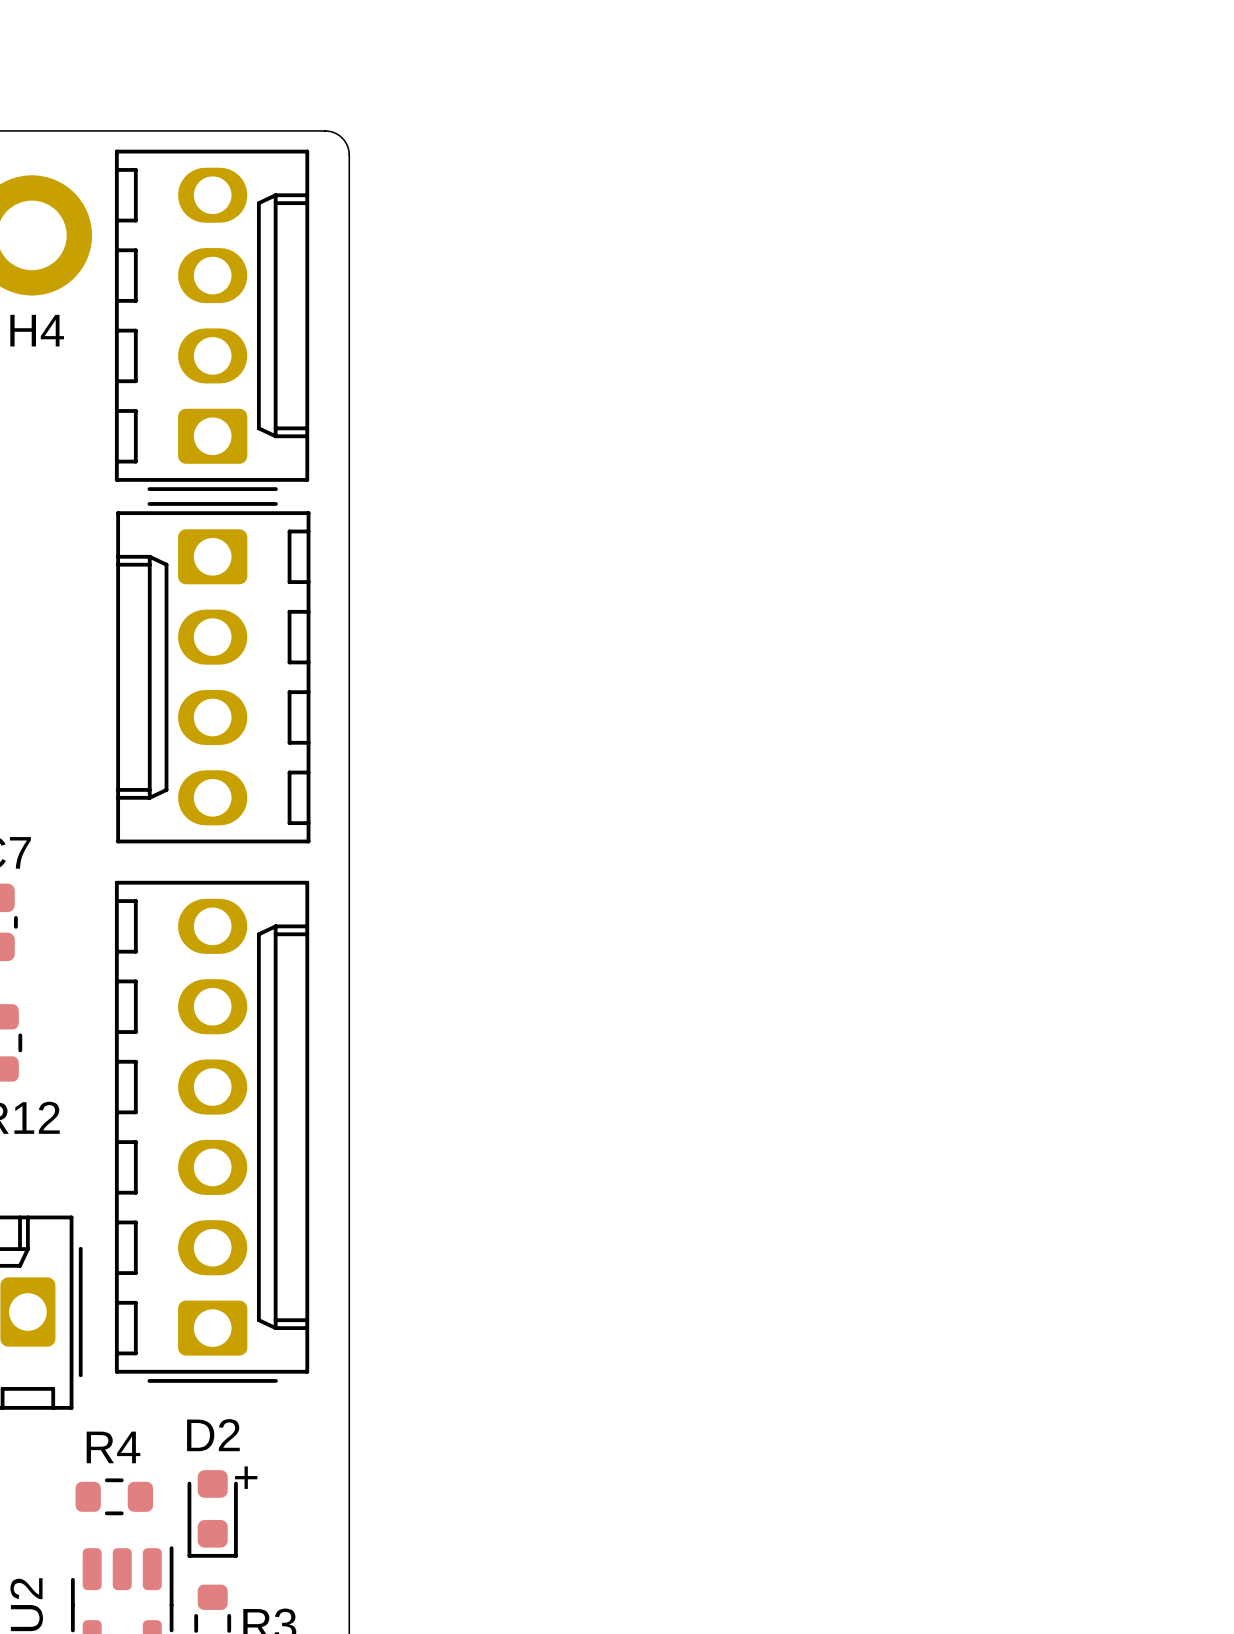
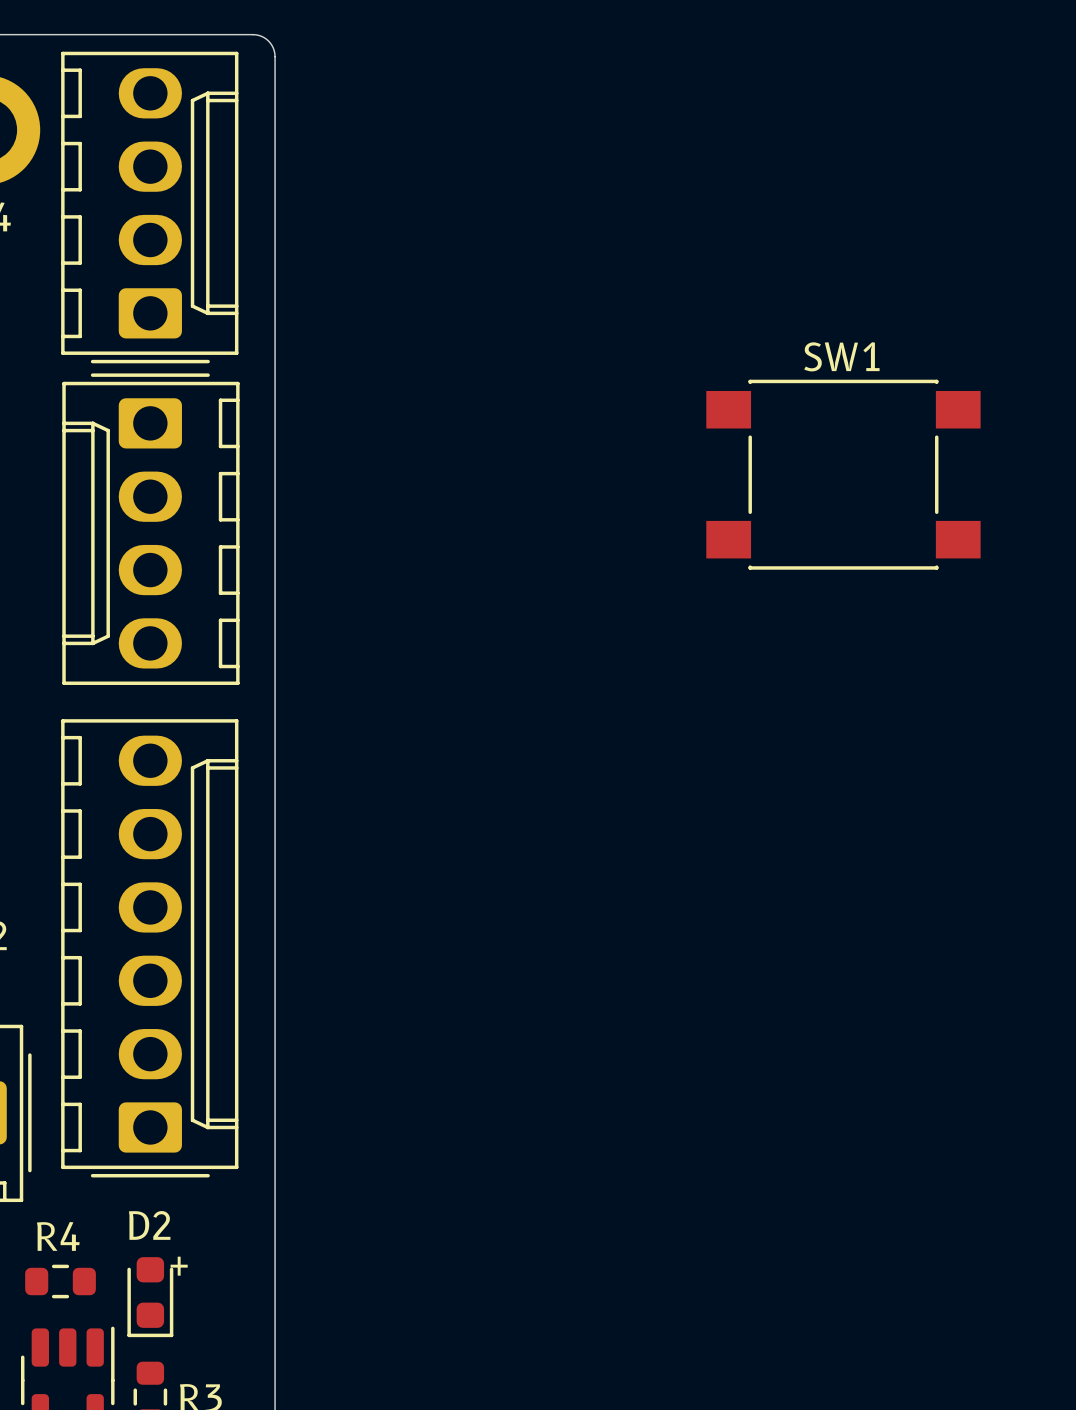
SW1: none -> (843, 474)

